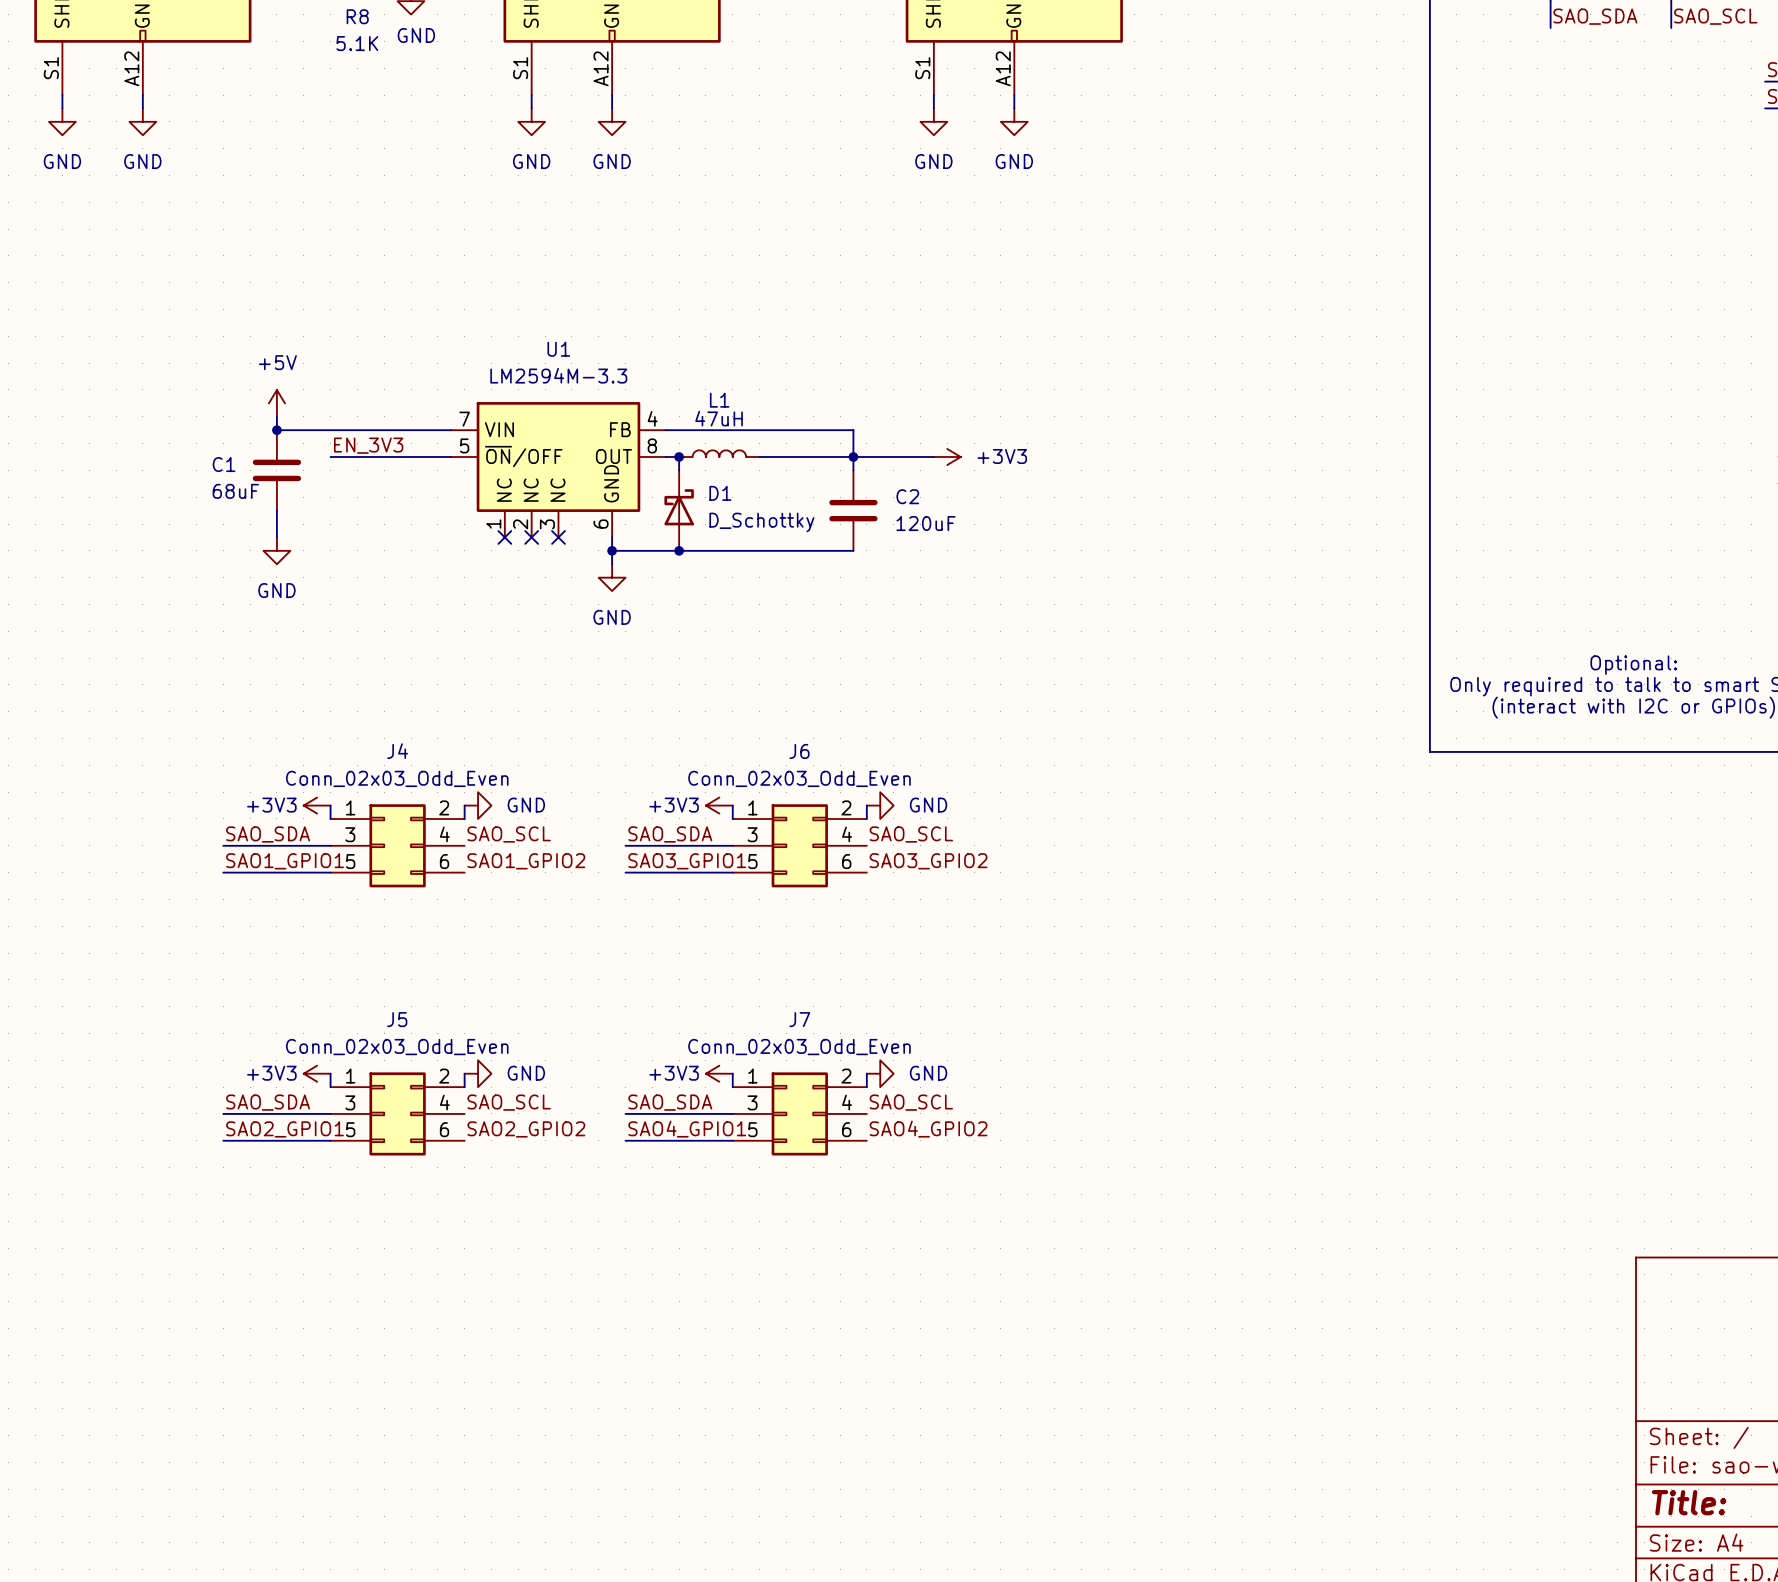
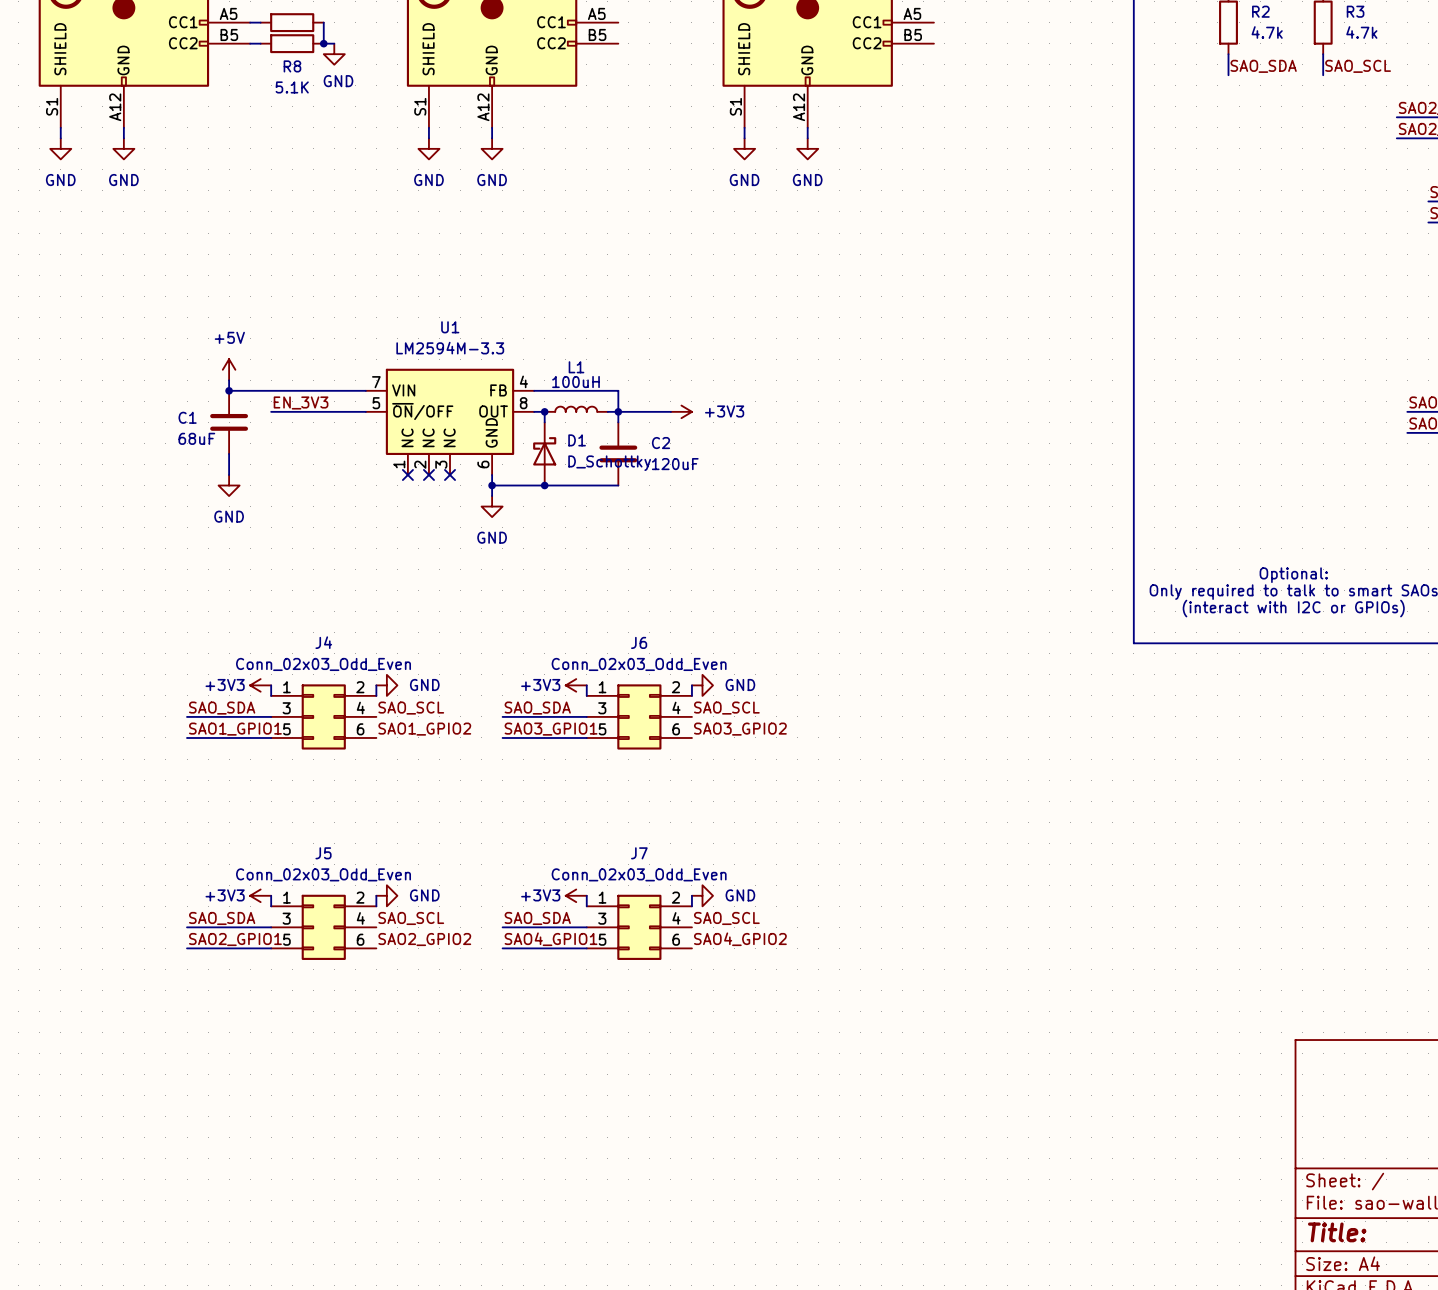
L1 value: 47uH (719, 418) -> 100uH (576, 382)
wire: (772, 430) (853, 430) (853, 470) -> (618, 390) (618, 422)
junction: none -> (618, 411)
wire: (840, 456) (933, 456) -> none
junction: (853, 456) -> none
power symbol position: +3V3 (947, 456) -> +3V3 (681, 411)
C2 position: (853, 510) -> (618, 453)
wire: (772, 550) (853, 550) -> none

